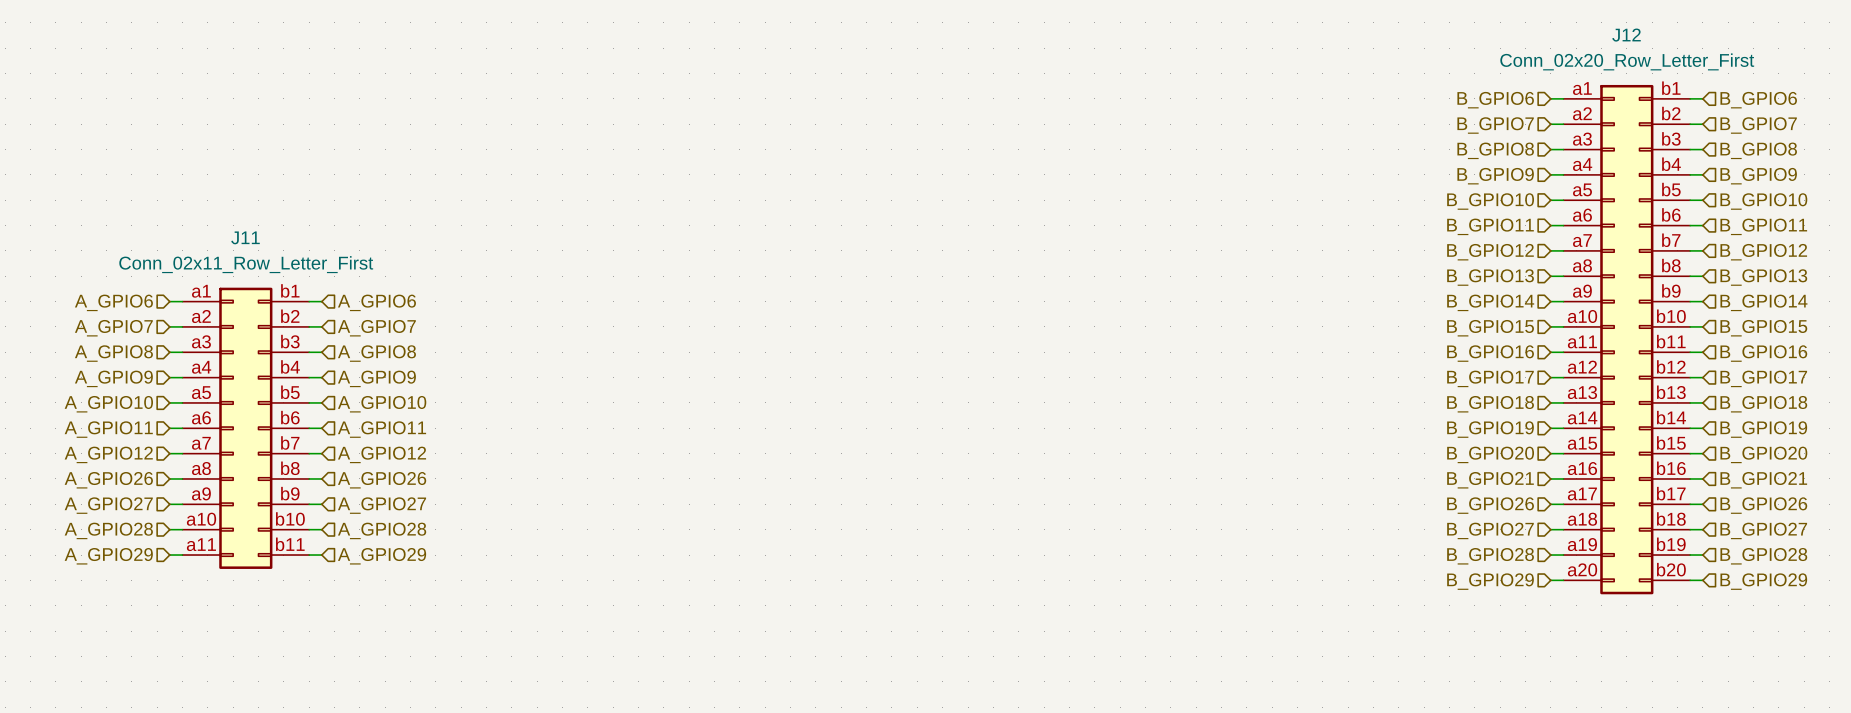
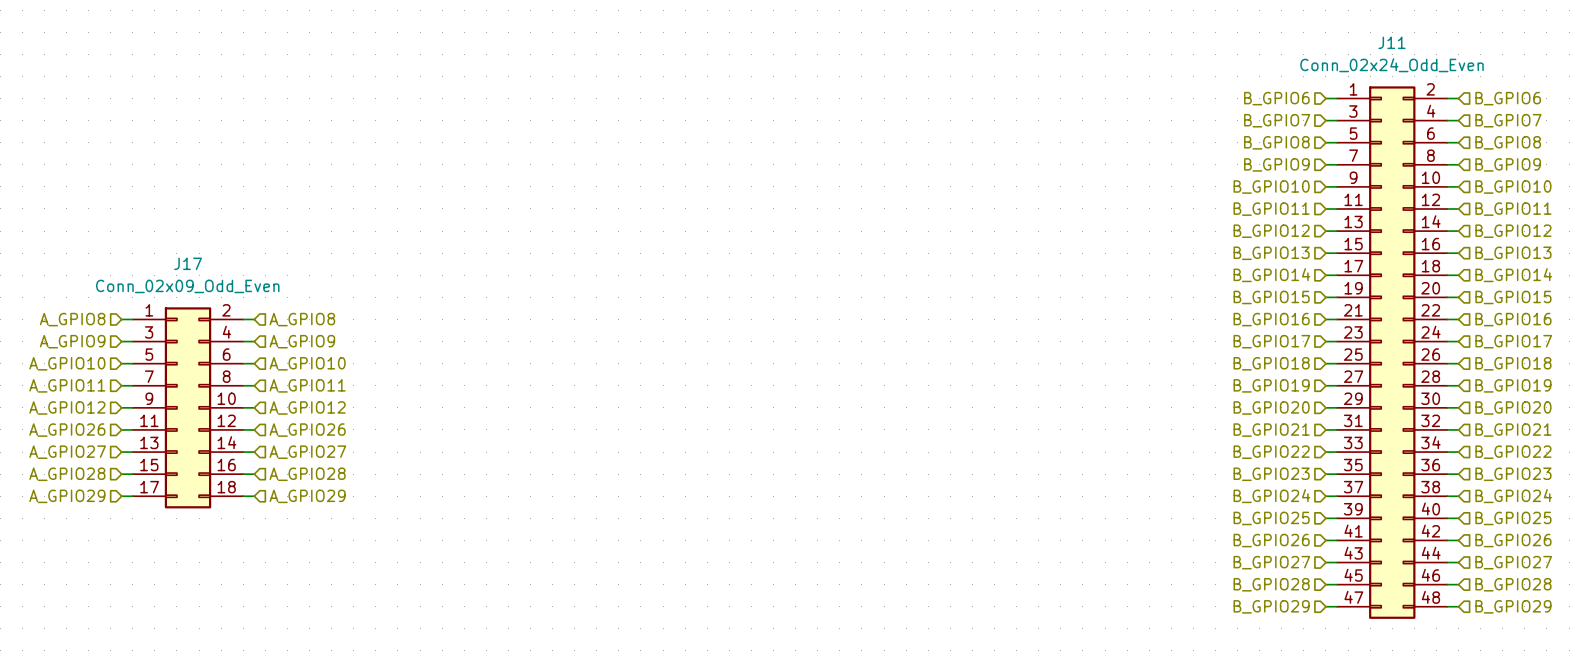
J11 name position: J11 (245, 237) -> J11 (1392, 42)
J11 value: Conn_02x11_Row_Letter_First (246, 264) -> Conn_02x24_Odd_Even (1392, 65)
J11 symbol: [182, 287, 310, 569] -> [1337, 86, 1448, 619]
wire: (169, 301) (182, 301) -> none
wire: (309, 301) (321, 301) -> none
hierarchical label: A_GPIO6 (113, 302) -> none
hierarchical label: A_GPIO6 (376, 302) -> none
wire: (169, 326) (182, 326) -> none
wire: (309, 326) (321, 326) -> none
hierarchical label: A_GPIO7 (113, 328) -> none
hierarchical label: A_GPIO7 (376, 328) -> none
J12: Conn_02x20_Row_Letter_First (1626, 339) -> none
J17: none -> Conn_02x09_Odd_Even (188, 407)
hierarchical label: B_GPIO26 (1490, 505) -> B_GPIO22 (1271, 452)
hierarchical label: B_GPIO26 (1763, 505) -> B_GPIO22 (1513, 452)
hierarchical label: B_GPIO27 (1490, 530) -> B_GPIO23 (1271, 474)
hierarchical label: B_GPIO27 (1763, 530) -> B_GPIO23 (1513, 474)
hierarchical label: B_GPIO28 (1490, 556) -> B_GPIO24 (1271, 496)
hierarchical label: B_GPIO28 (1763, 556) -> B_GPIO24 (1513, 496)
hierarchical label: B_GPIO29 (1490, 581) -> B_GPIO25 (1271, 518)
hierarchical label: B_GPIO29 (1763, 581) -> B_GPIO25 (1513, 518)
wire: none -> (1325, 540) (1337, 540)
wire: none -> (1447, 540) (1458, 540)
hierarchical label: none -> B_GPIO26 (1271, 540)
hierarchical label: none -> B_GPIO26 (1513, 540)
wire: none -> (1325, 562) (1337, 562)
wire: none -> (1447, 562) (1458, 562)
hierarchical label: none -> B_GPIO27 (1271, 562)
hierarchical label: none -> B_GPIO27 (1513, 562)
wire: none -> (1325, 584) (1337, 584)
wire: none -> (1447, 584) (1458, 584)
hierarchical label: none -> B_GPIO28 (1271, 584)
hierarchical label: none -> B_GPIO28 (1513, 584)
wire: none -> (1325, 606) (1337, 606)
wire: none -> (1447, 606) (1458, 606)
hierarchical label: none -> B_GPIO29 (1271, 606)
hierarchical label: none -> B_GPIO29 (1513, 606)

